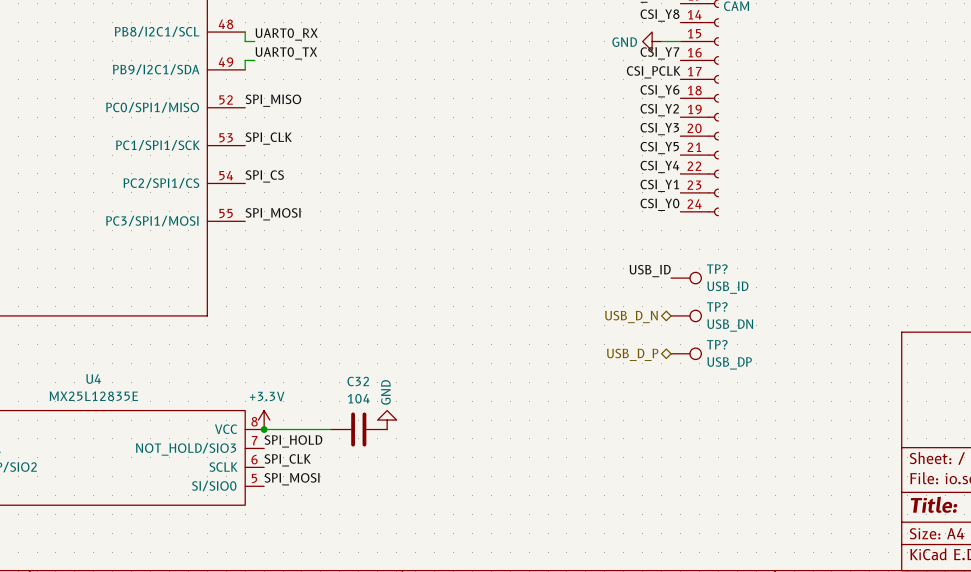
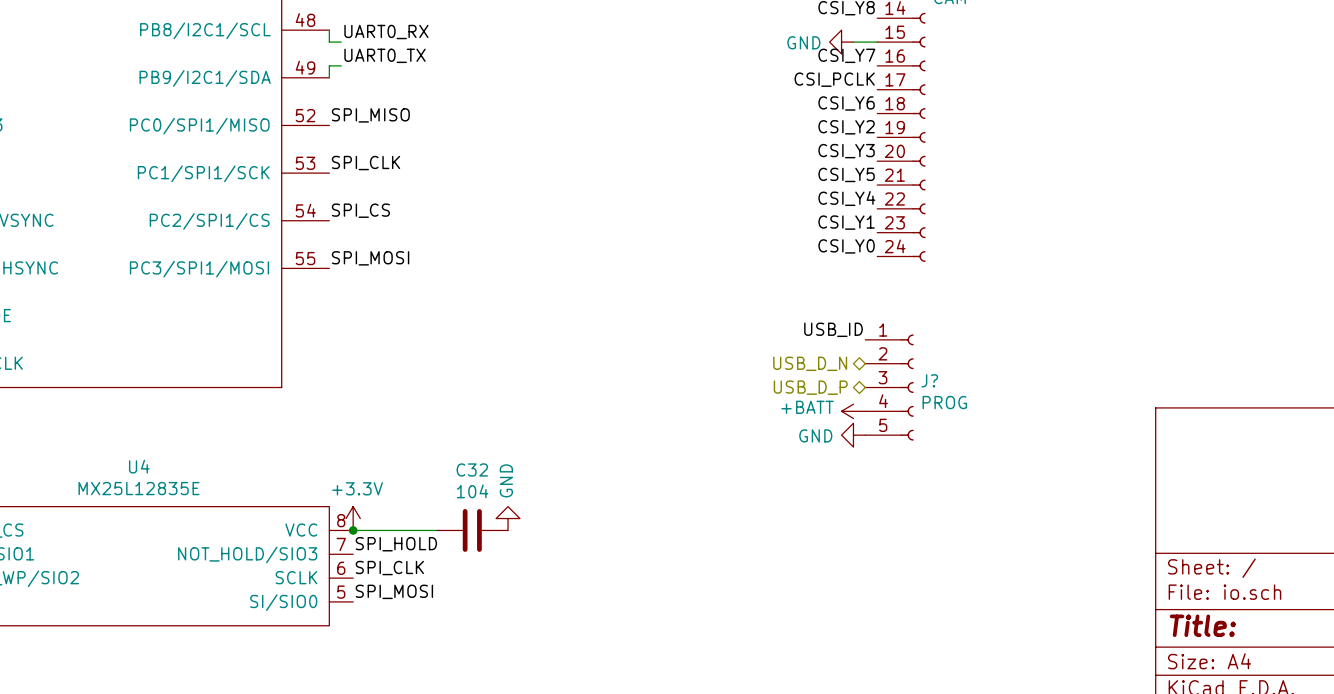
TP?: USB_ID (686, 278) -> none
hierarchical label: none -> USB_D_N (810, 363)
TP?: USB_DN (686, 315) -> none
J?: none -> PROG (889, 387)
hierarchical label: USB_D_N (631, 317) -> USB_D_P (810, 387)
power symbol: none -> +BATT (853, 411)
power symbol: none -> GND (853, 435)
TP?: USB_DP (686, 353) -> none
hierarchical label: USB_D_P (632, 354) -> none

